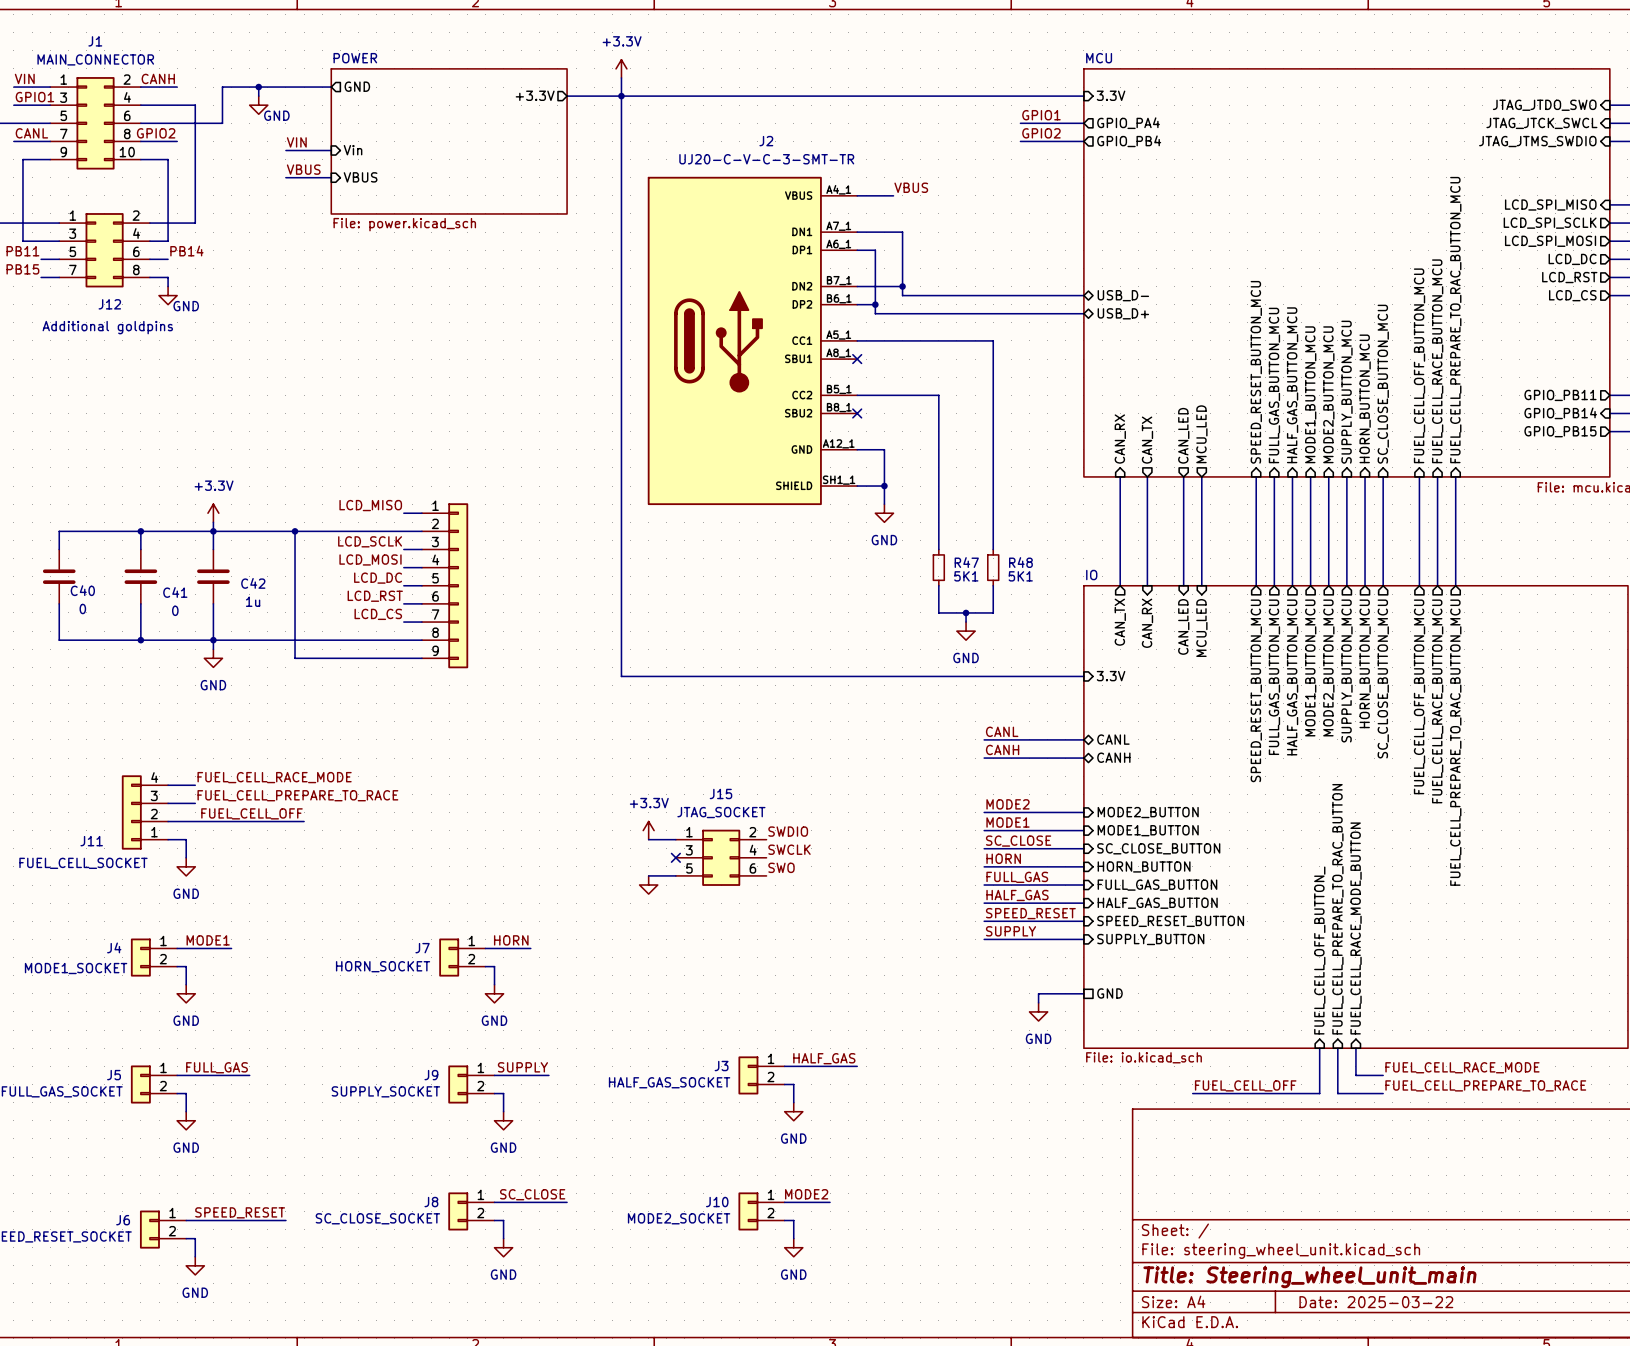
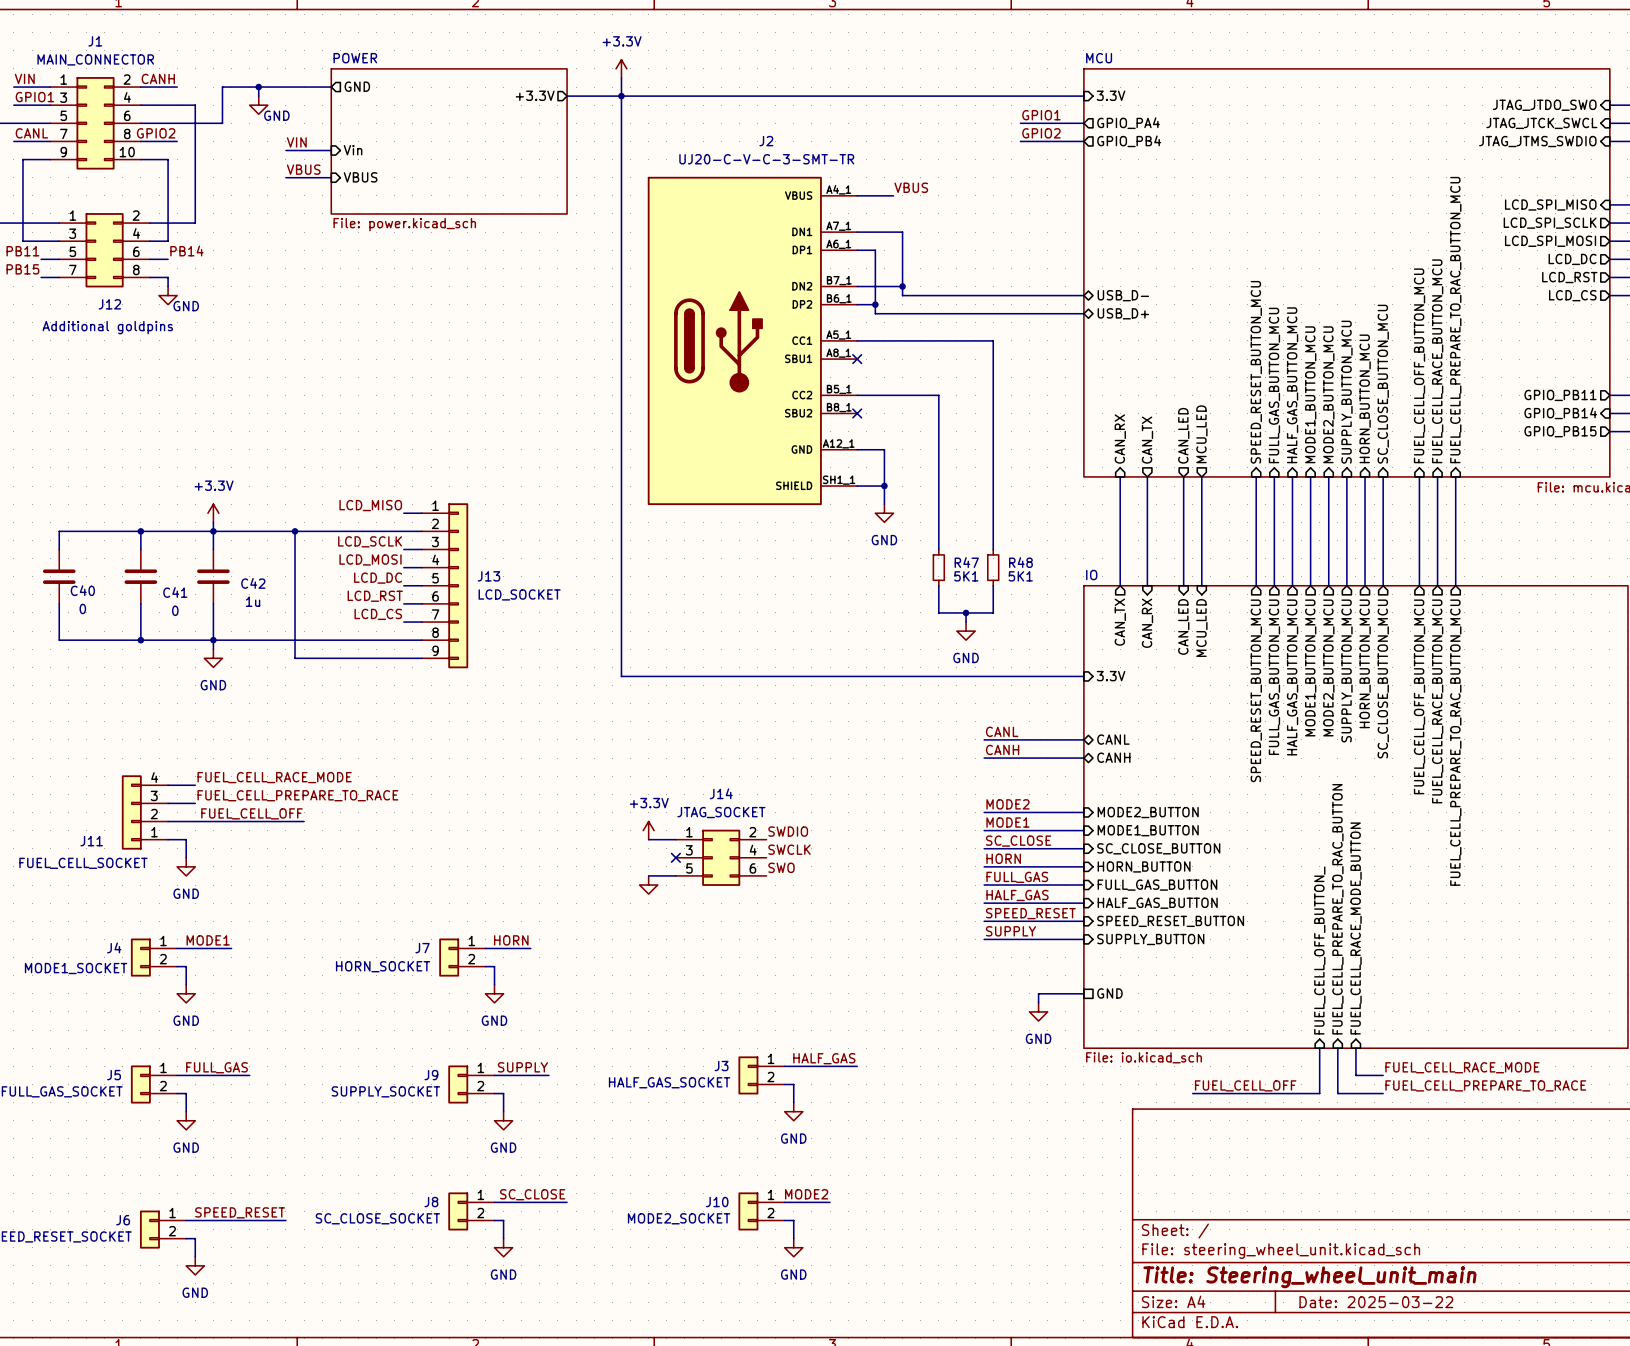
J13 name: none -> J13 (488, 576)
J13 value: none -> LCD_SOCKET (519, 594)
J15 name: J15 (720, 793) -> J14 (721, 793)

